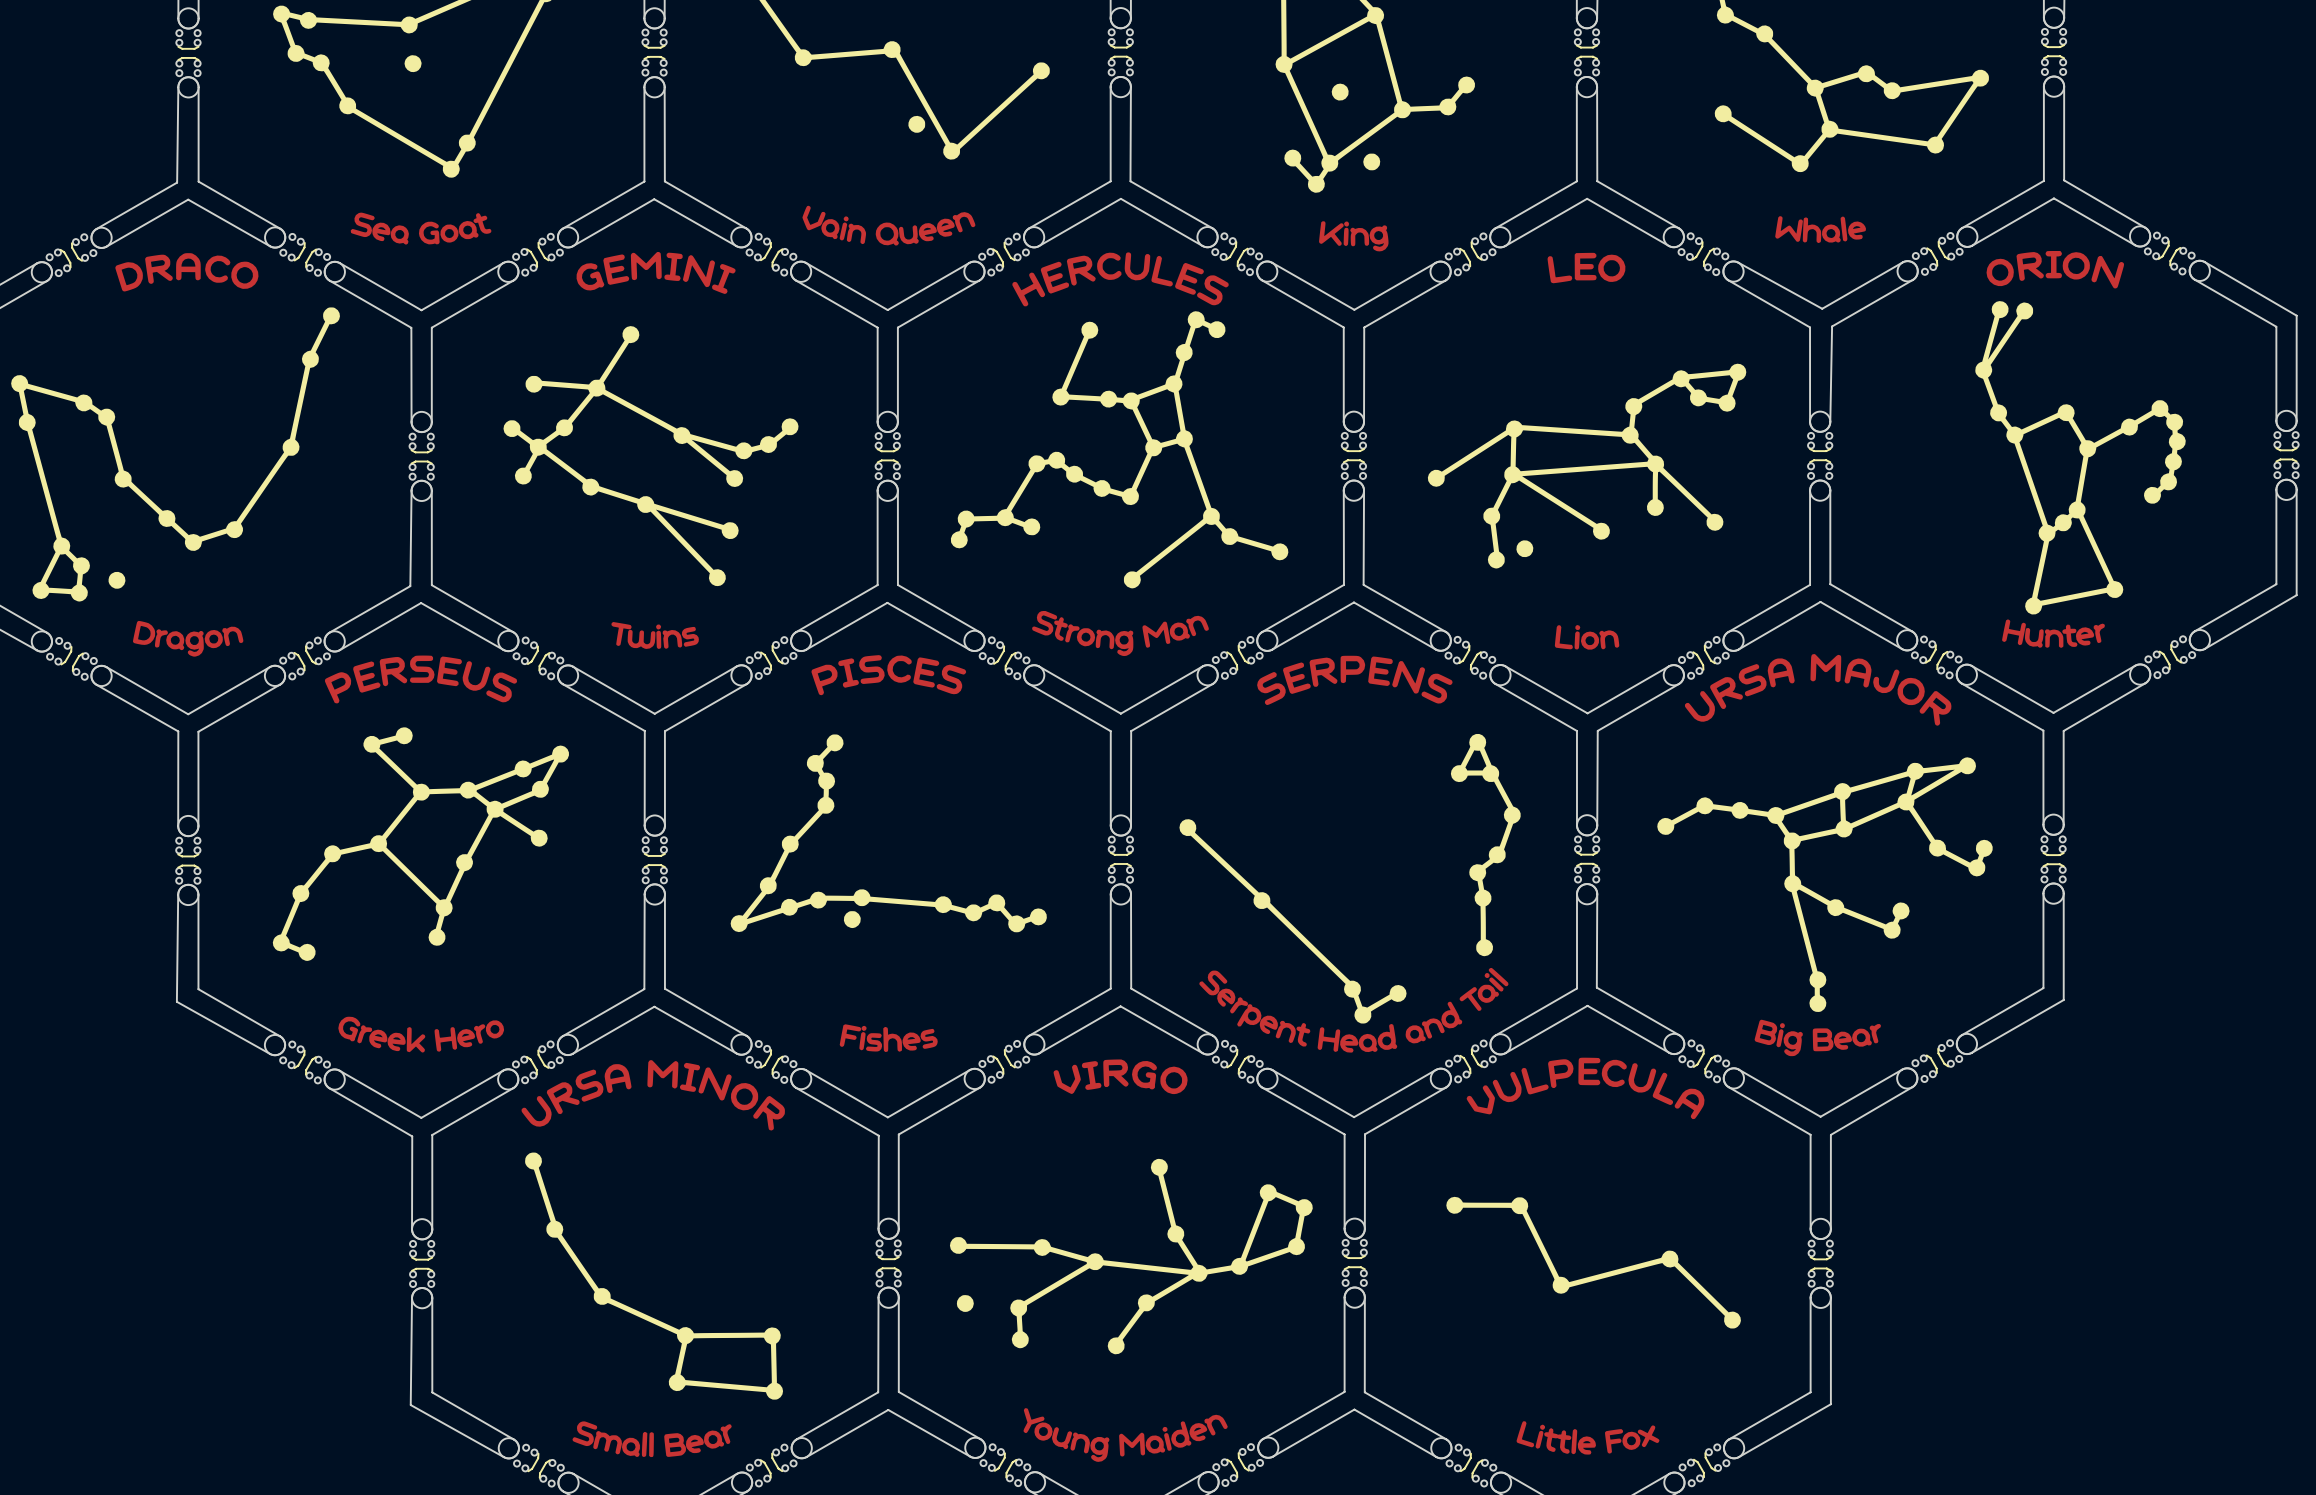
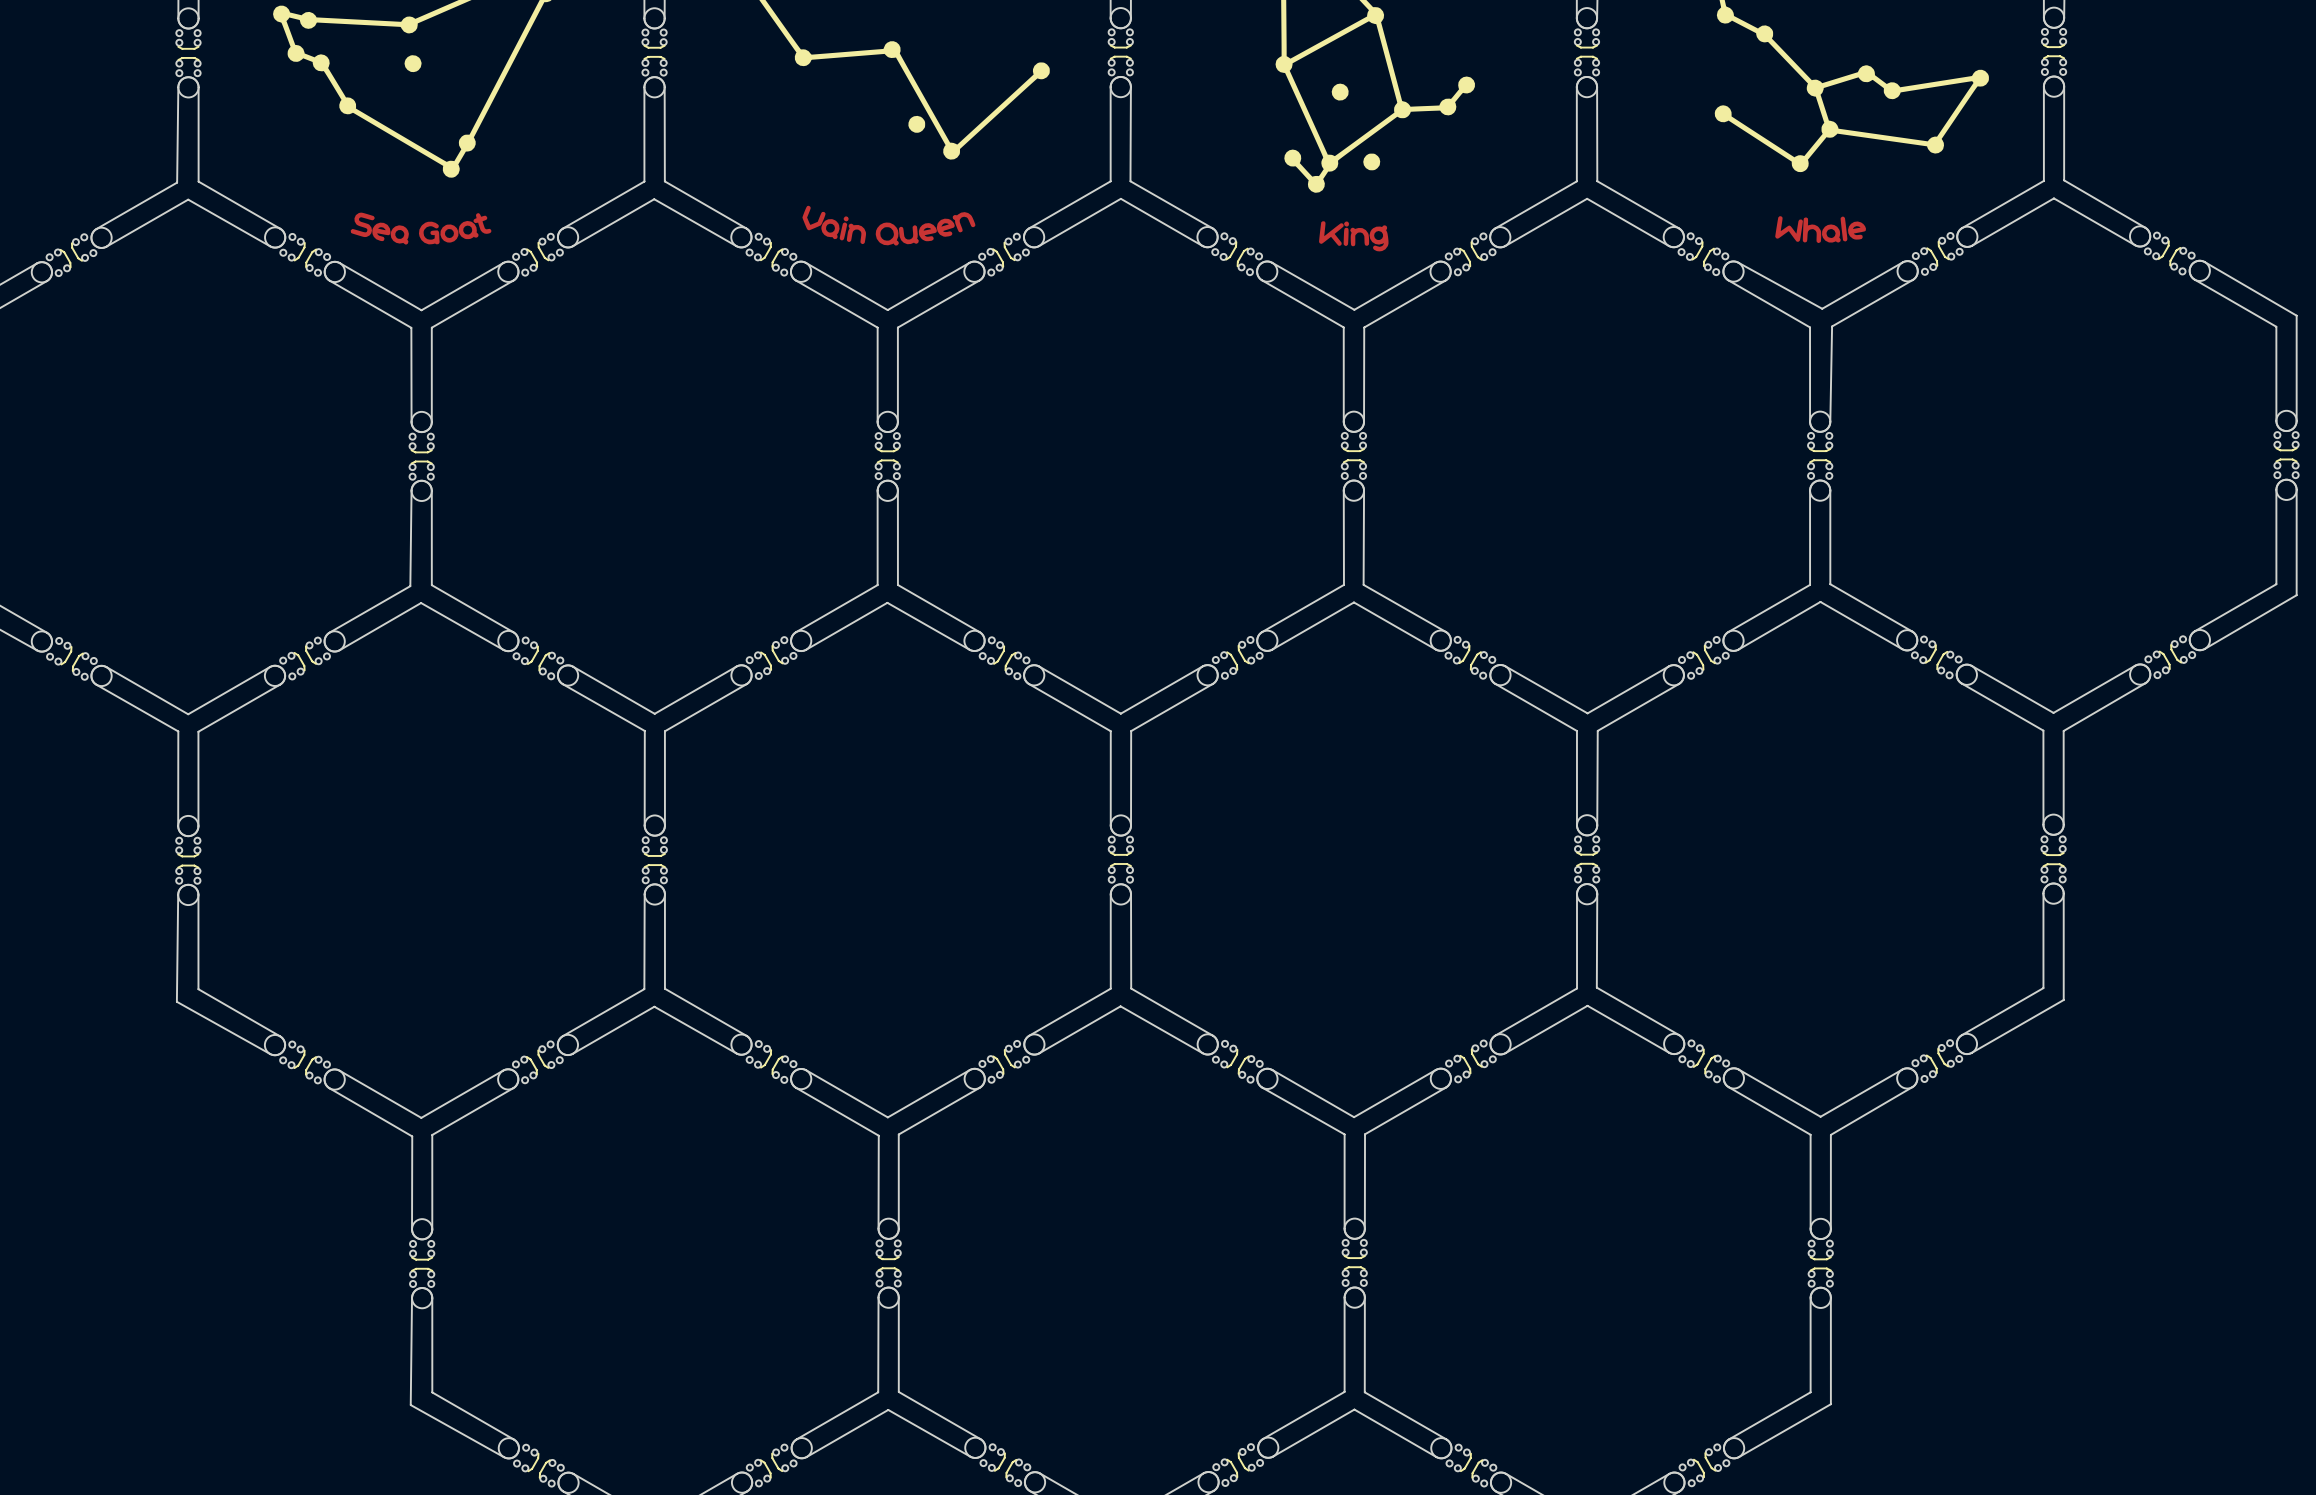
drawing: [503, 251, 799, 649] -> none
drawing: [1975, 251, 2186, 648] -> none
drawing: [949, 252, 1993, 1462] -> none
drawing: [1427, 252, 1747, 650] -> none
drawing: [11, 253, 340, 657] -> none
drawing: [272, 655, 785, 1458] -> none
drawing: [730, 655, 1047, 1052] -> none

